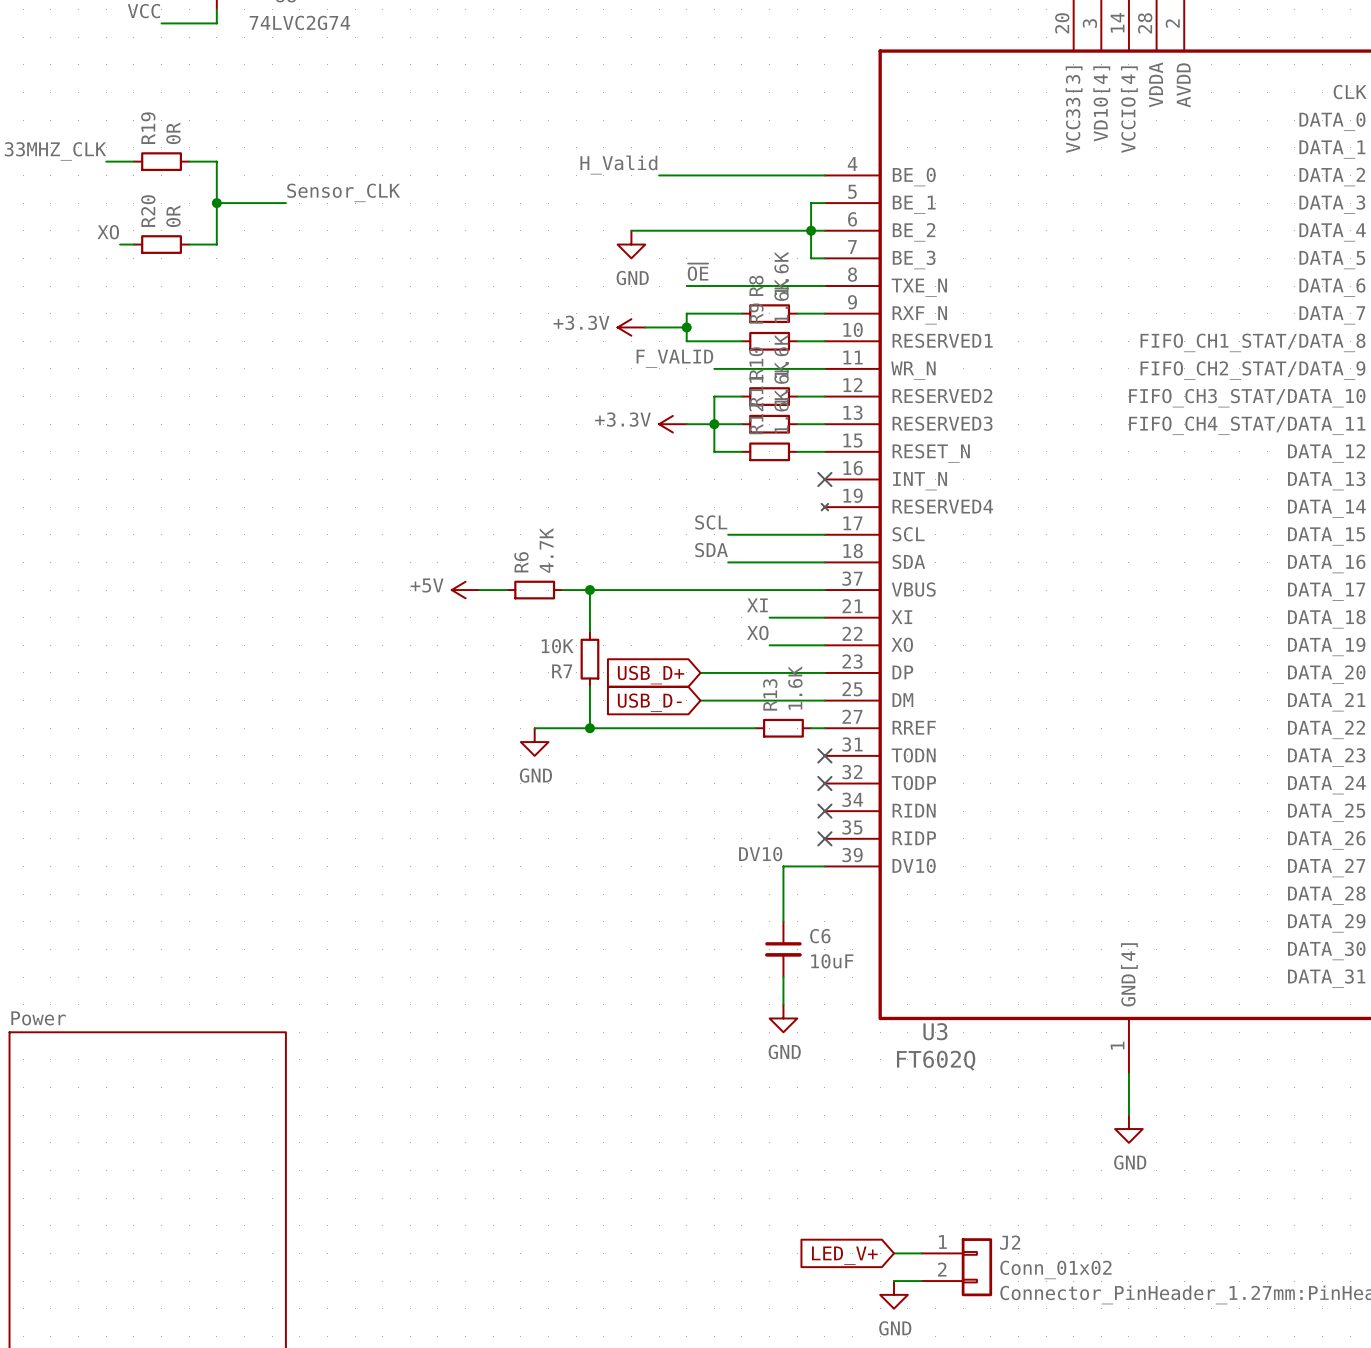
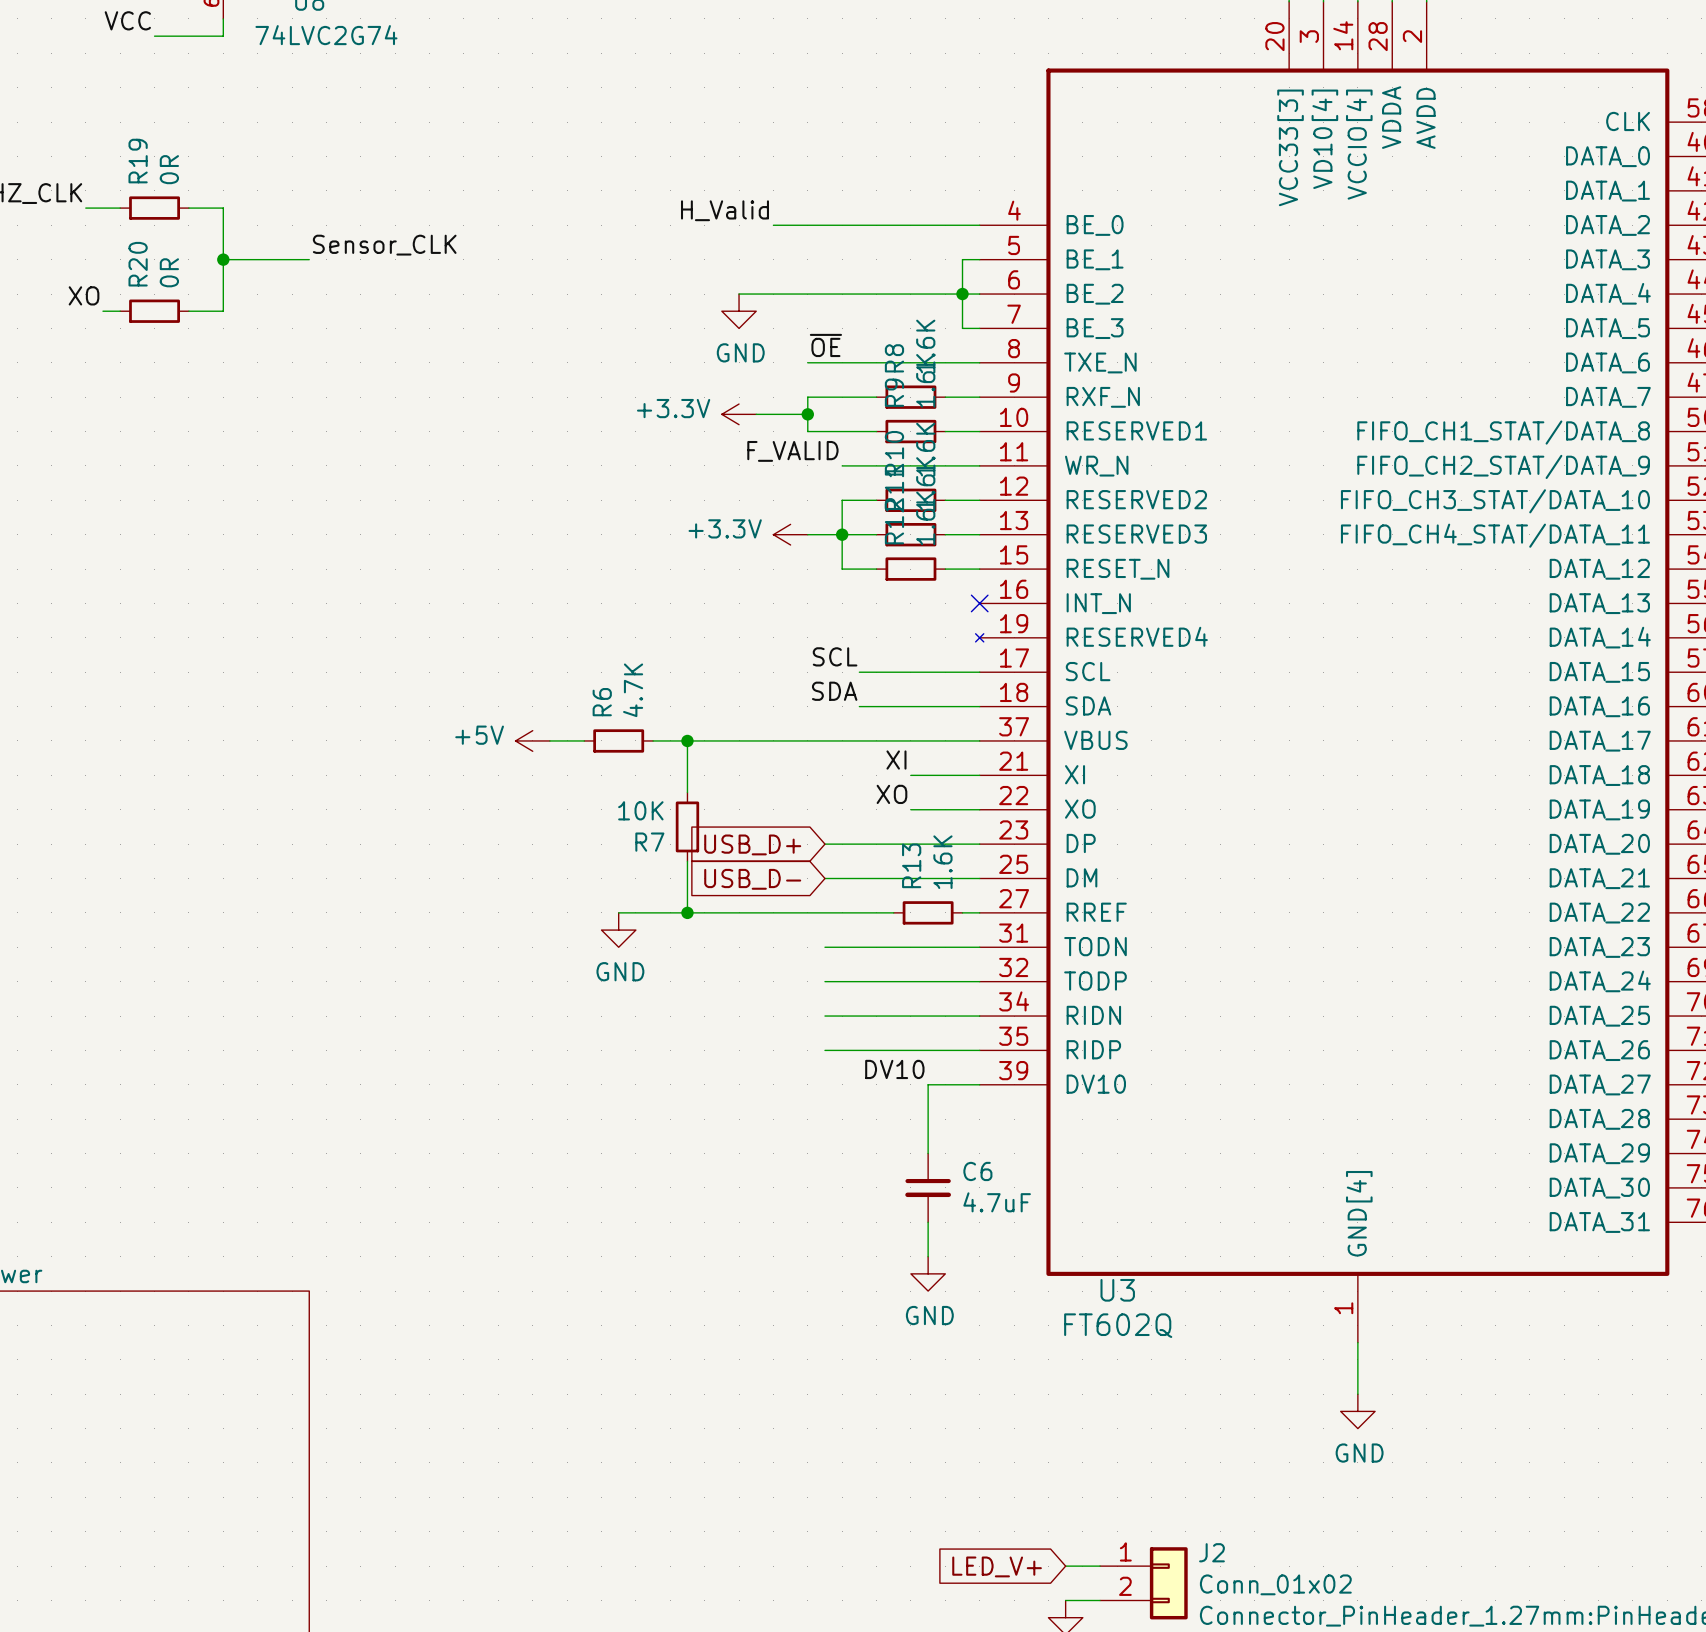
wire: none -> (824, 947) (979, 947)
no-connect mark: (824, 755) -> none
wire: none -> (824, 981) (979, 981)
no-connect mark: (824, 783) -> none
wire: none -> (824, 1016) (979, 1016)
no-connect mark: (824, 811) -> none
wire: none -> (824, 1050) (979, 1050)
no-connect mark: (824, 838) -> none
C6 value: 10uF (832, 961) -> 4.7uF (997, 1202)

